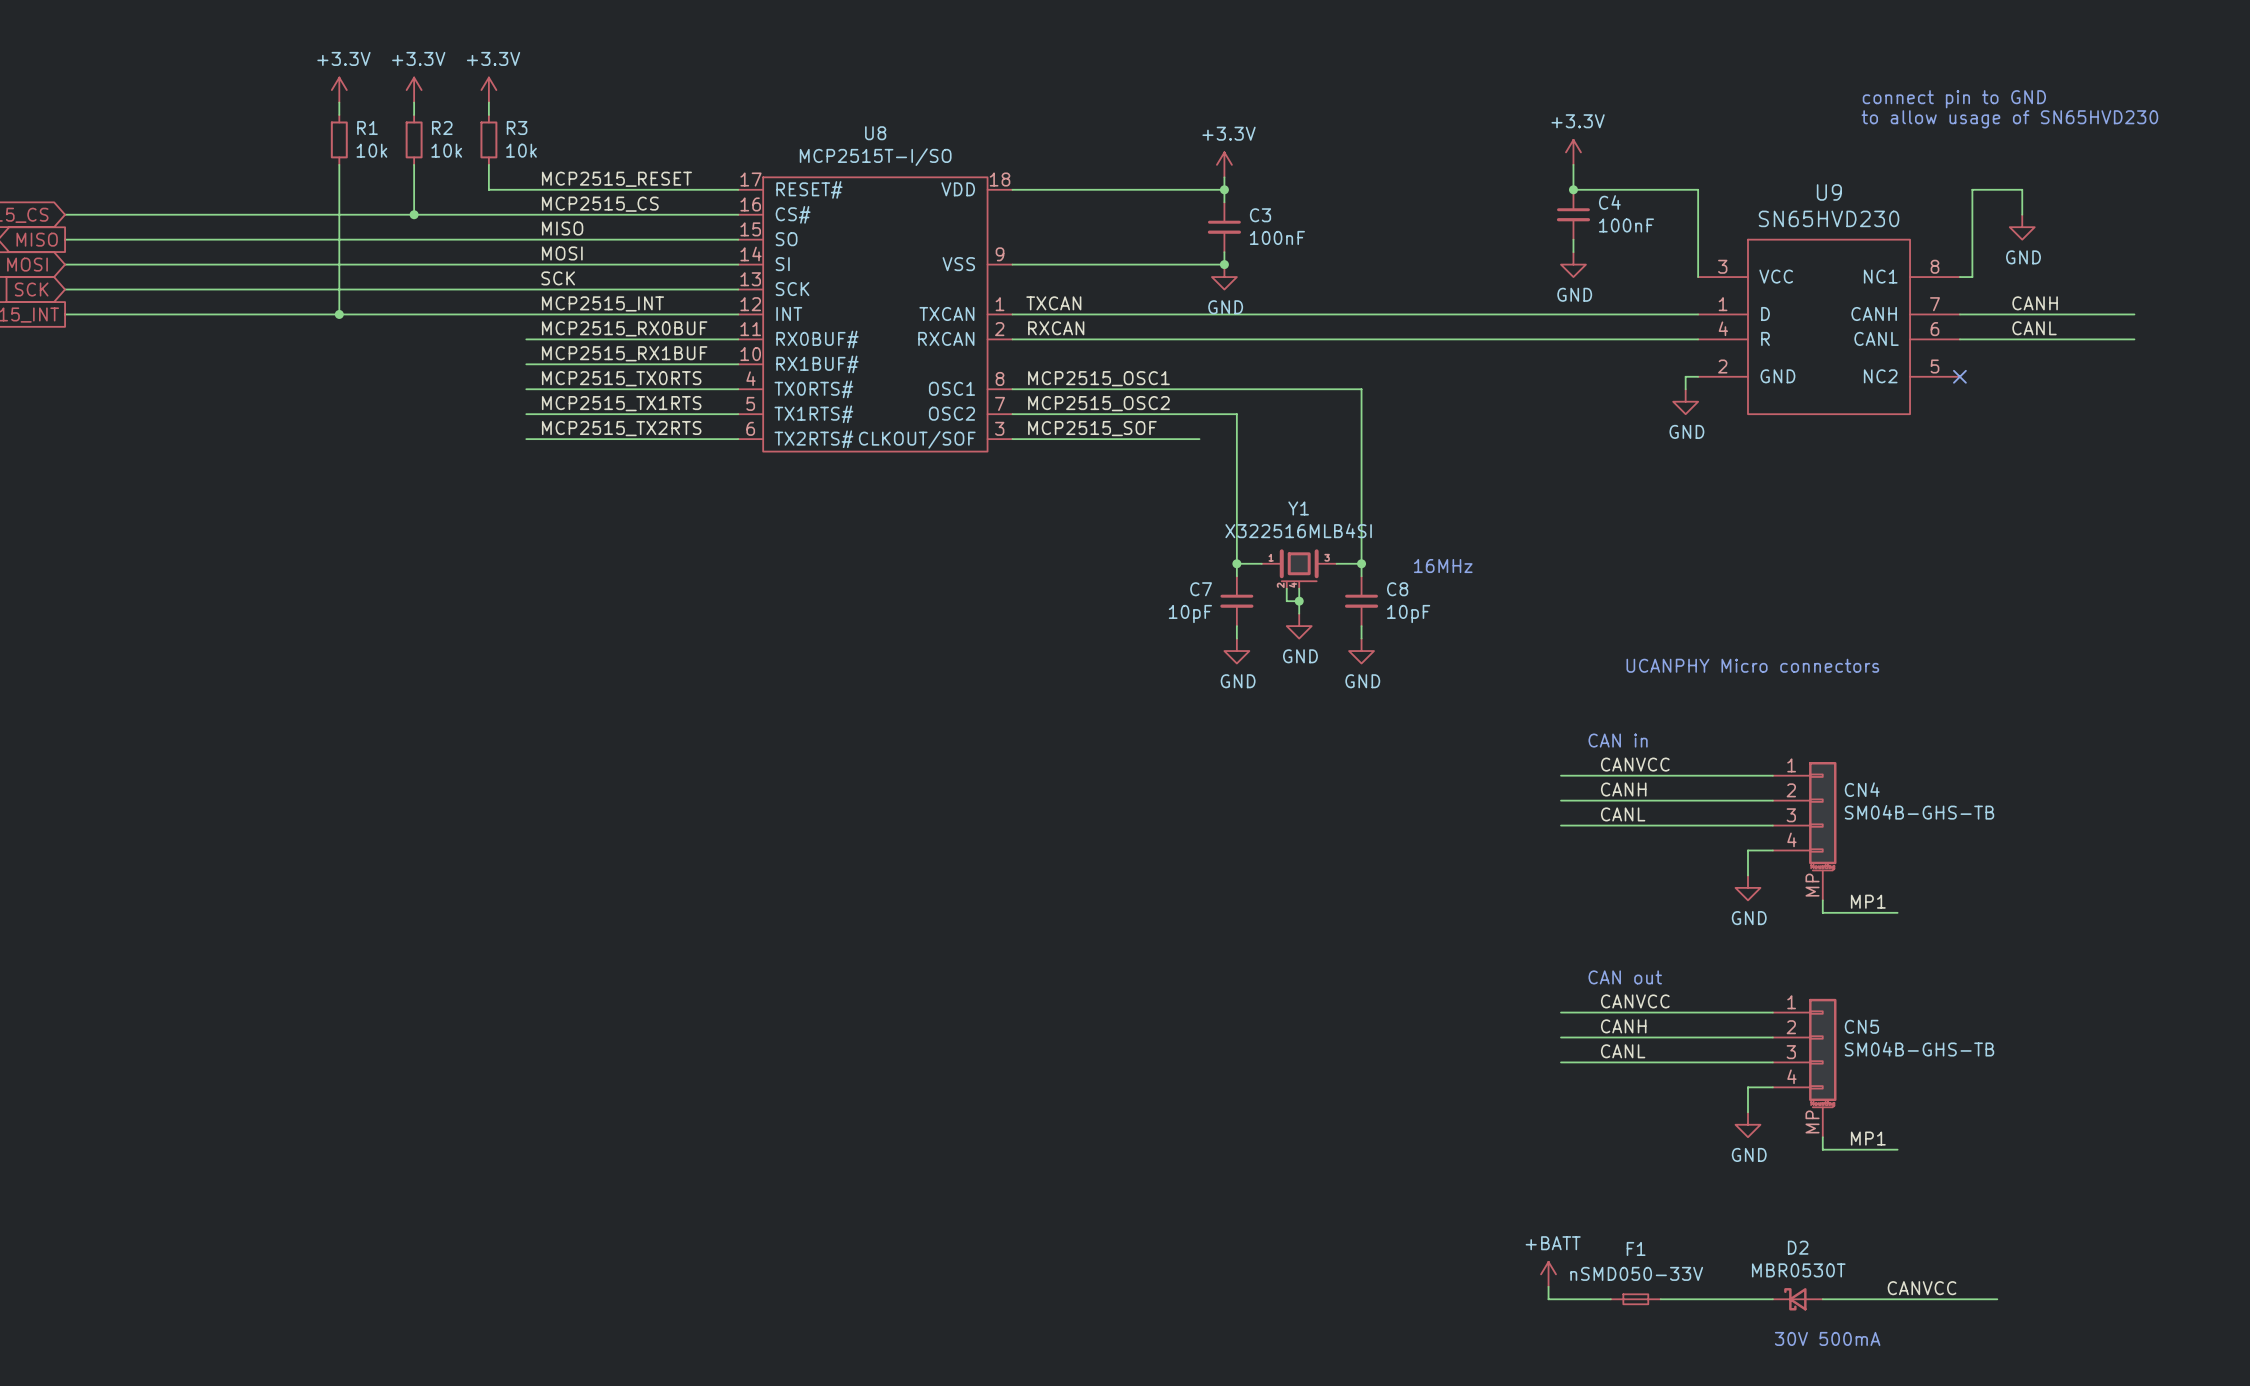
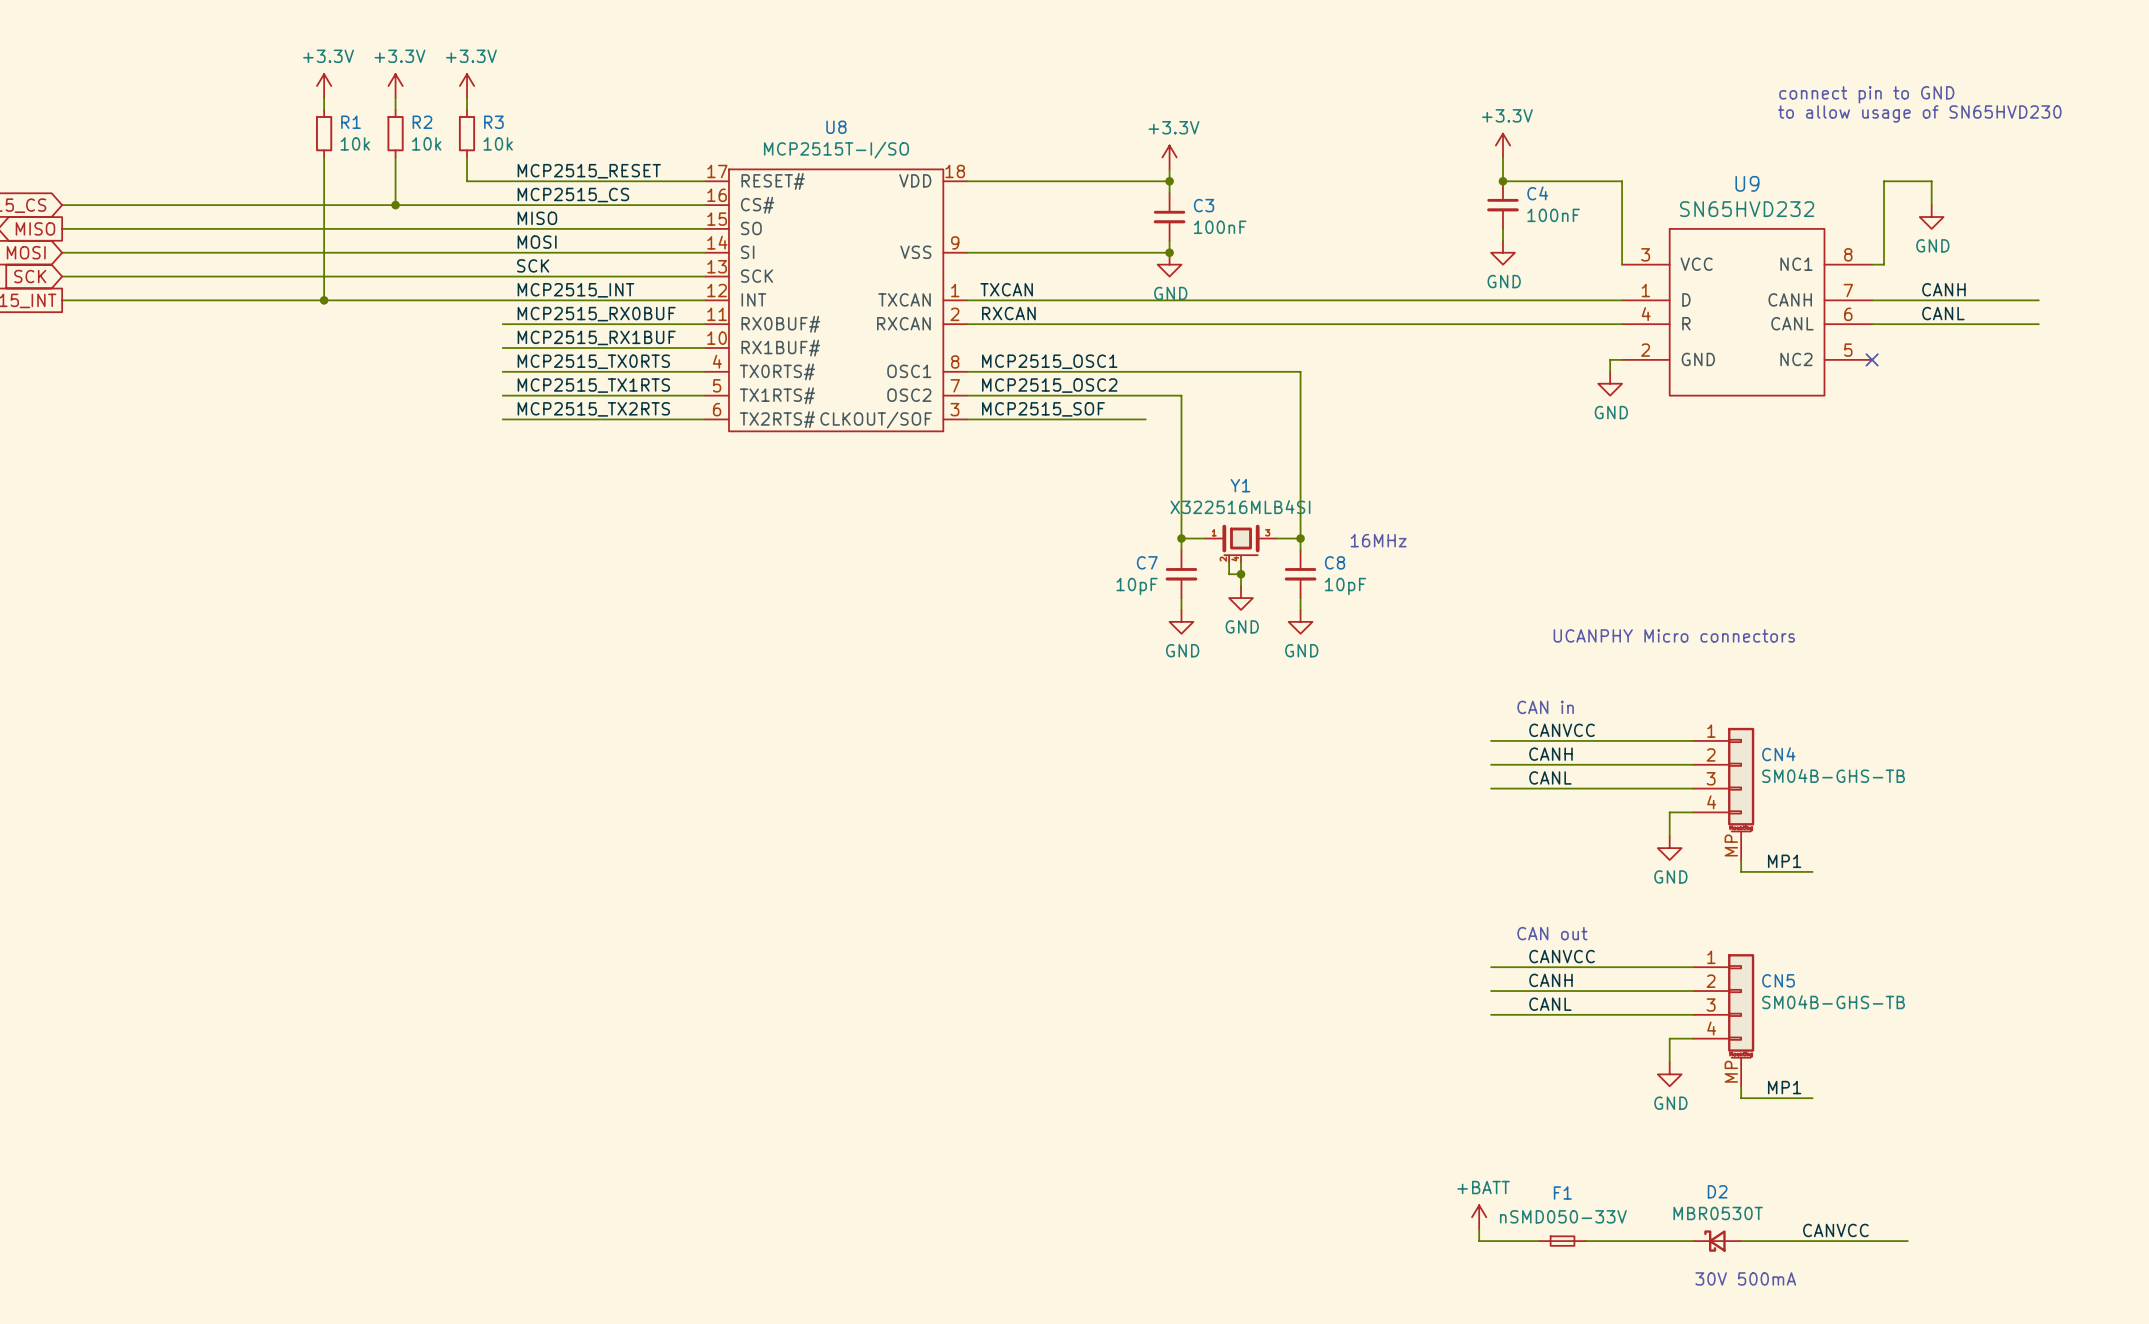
U9 value: SN65HVD230 (1829, 218) -> SN65HVD232 (1747, 209)

